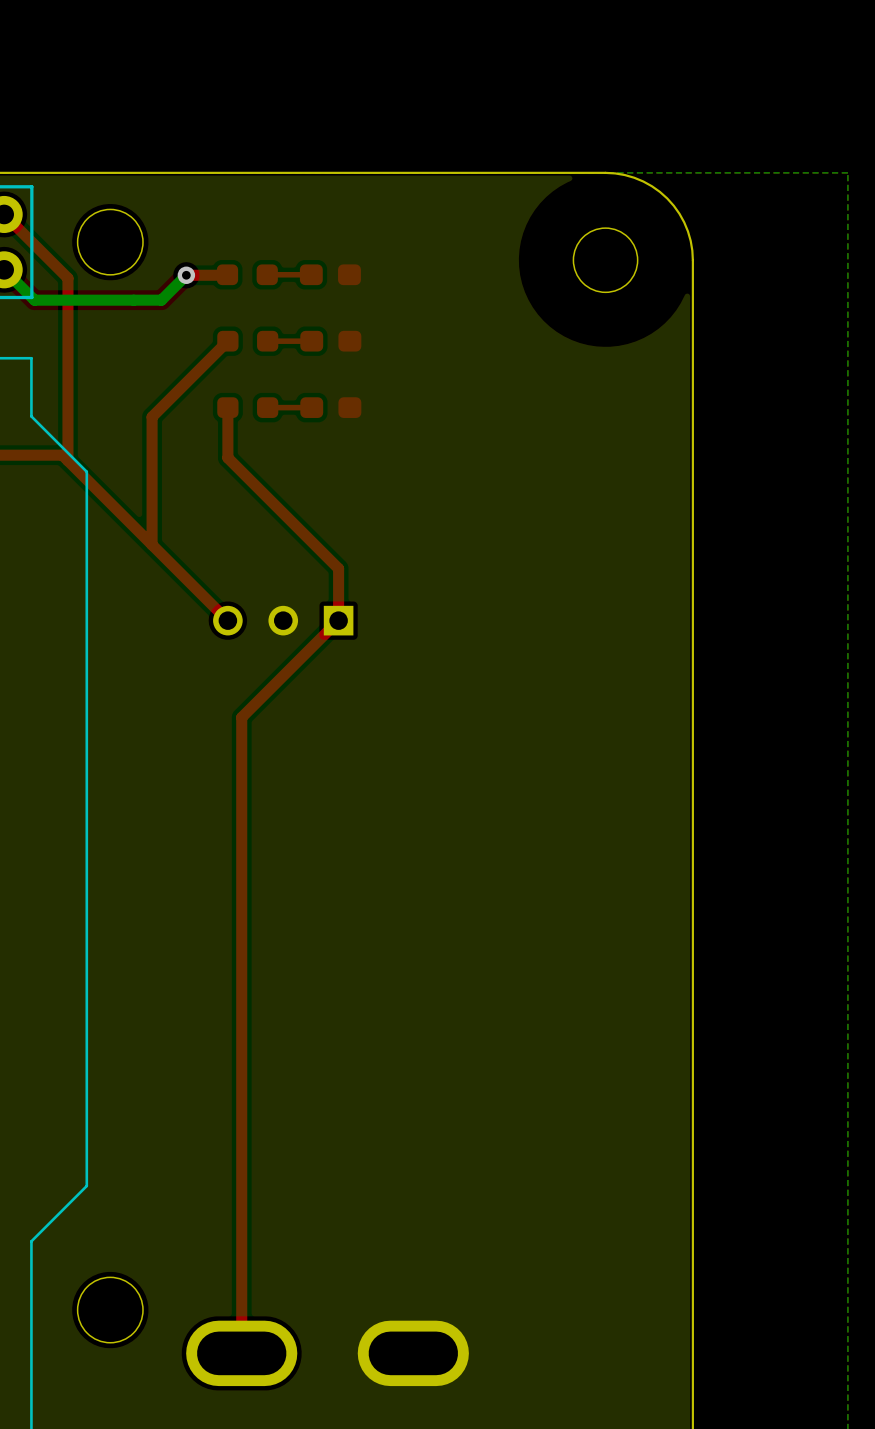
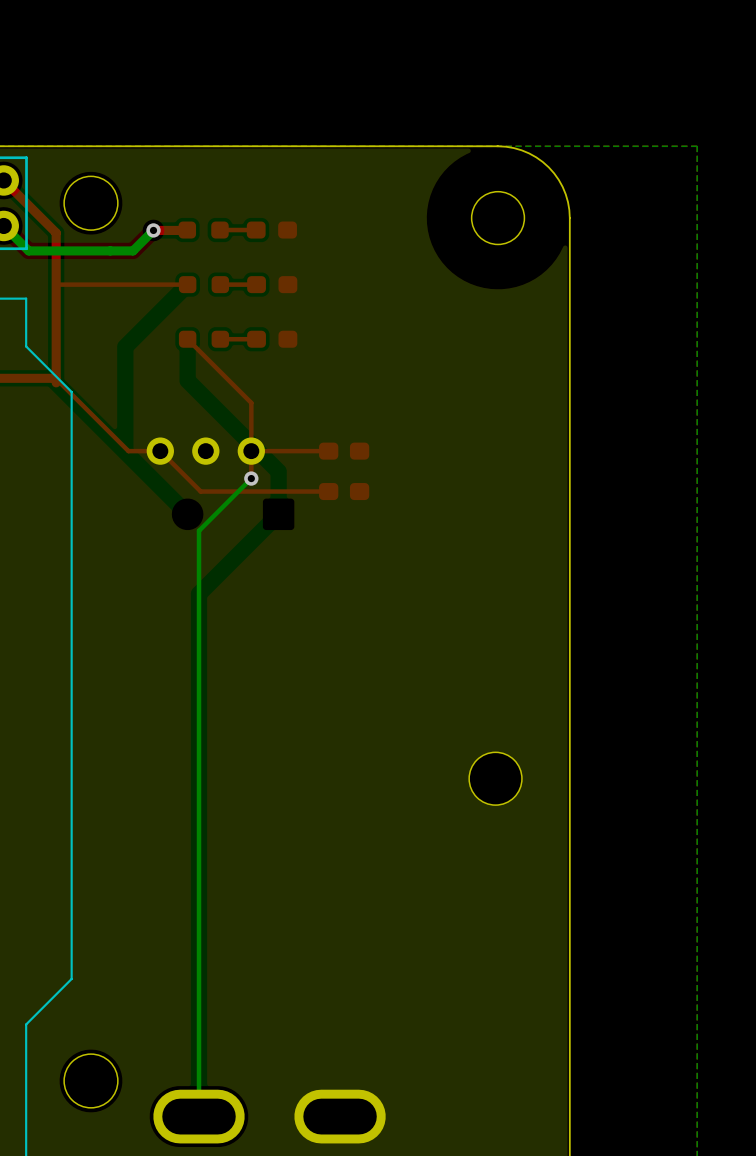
top track: (227, 341) (152, 417) (152, 544) -> (187, 284) (57, 284) (55, 282)
top track: (227, 407) (227, 457) (338, 568) (338, 620) (241, 717) (241, 1353) -> (187, 339) (251, 402) (251, 478)
top track: (62, 455) (227, 620) -> (51, 378) (55, 378) (128, 451) (160, 451) (200, 491) (328, 491)
part: none -> (205, 451)
top track: none -> (328, 451) (251, 451)
part: none -> (344, 451)
bottom track: none -> (251, 478) (199, 530) (199, 1116)
via: none -> (251, 478)
part: none -> (344, 491)
part: (283, 620) -> none
part: none -> (495, 778)

